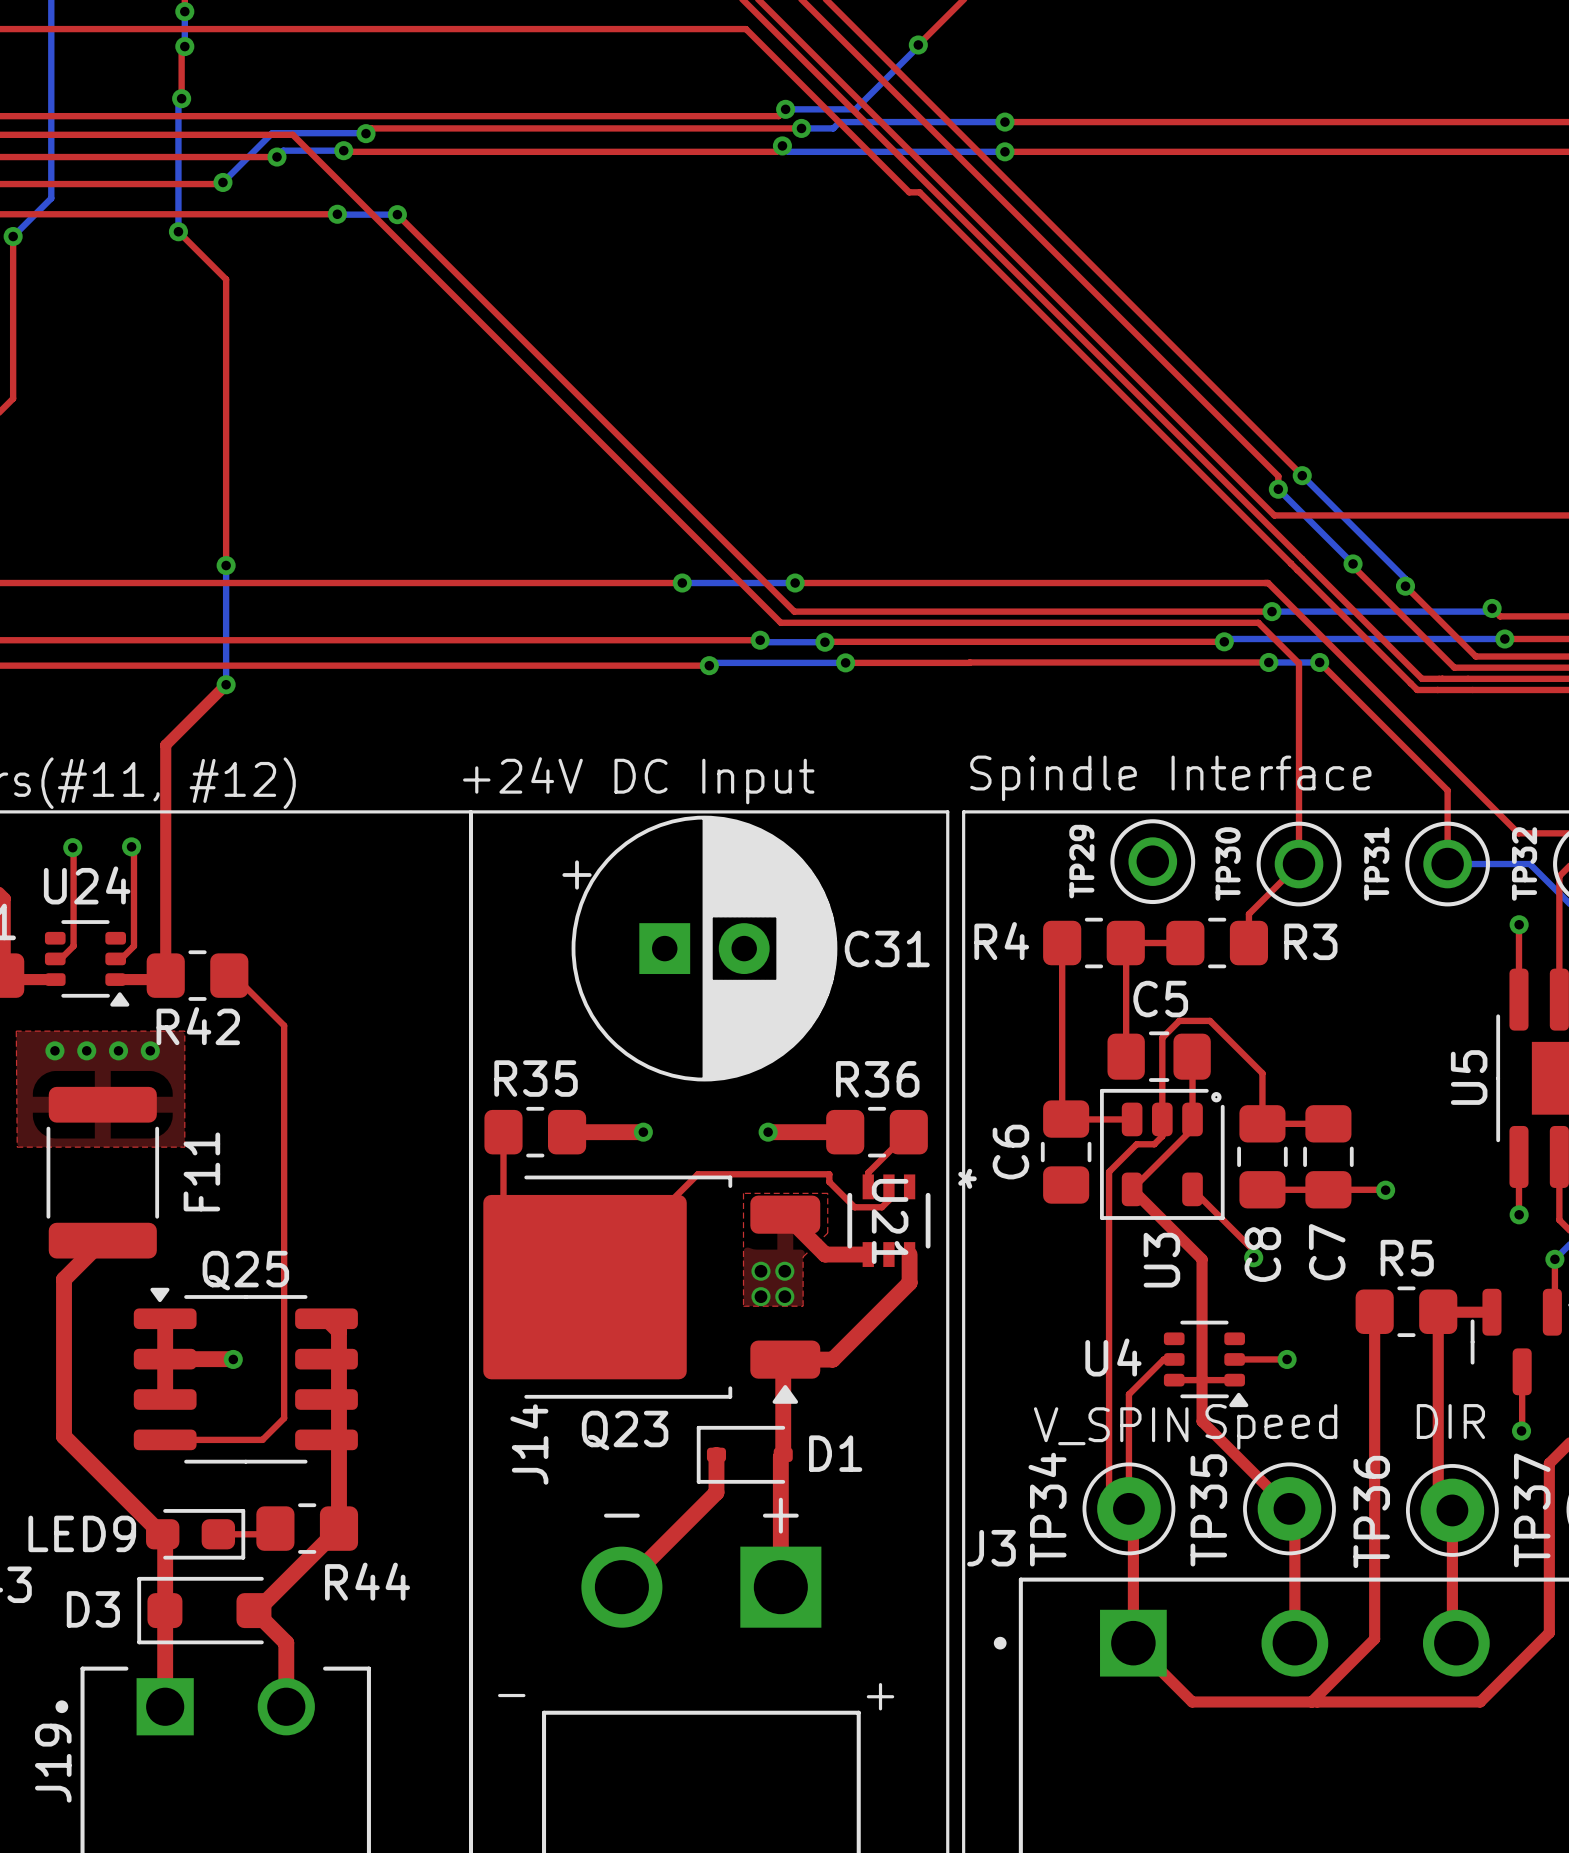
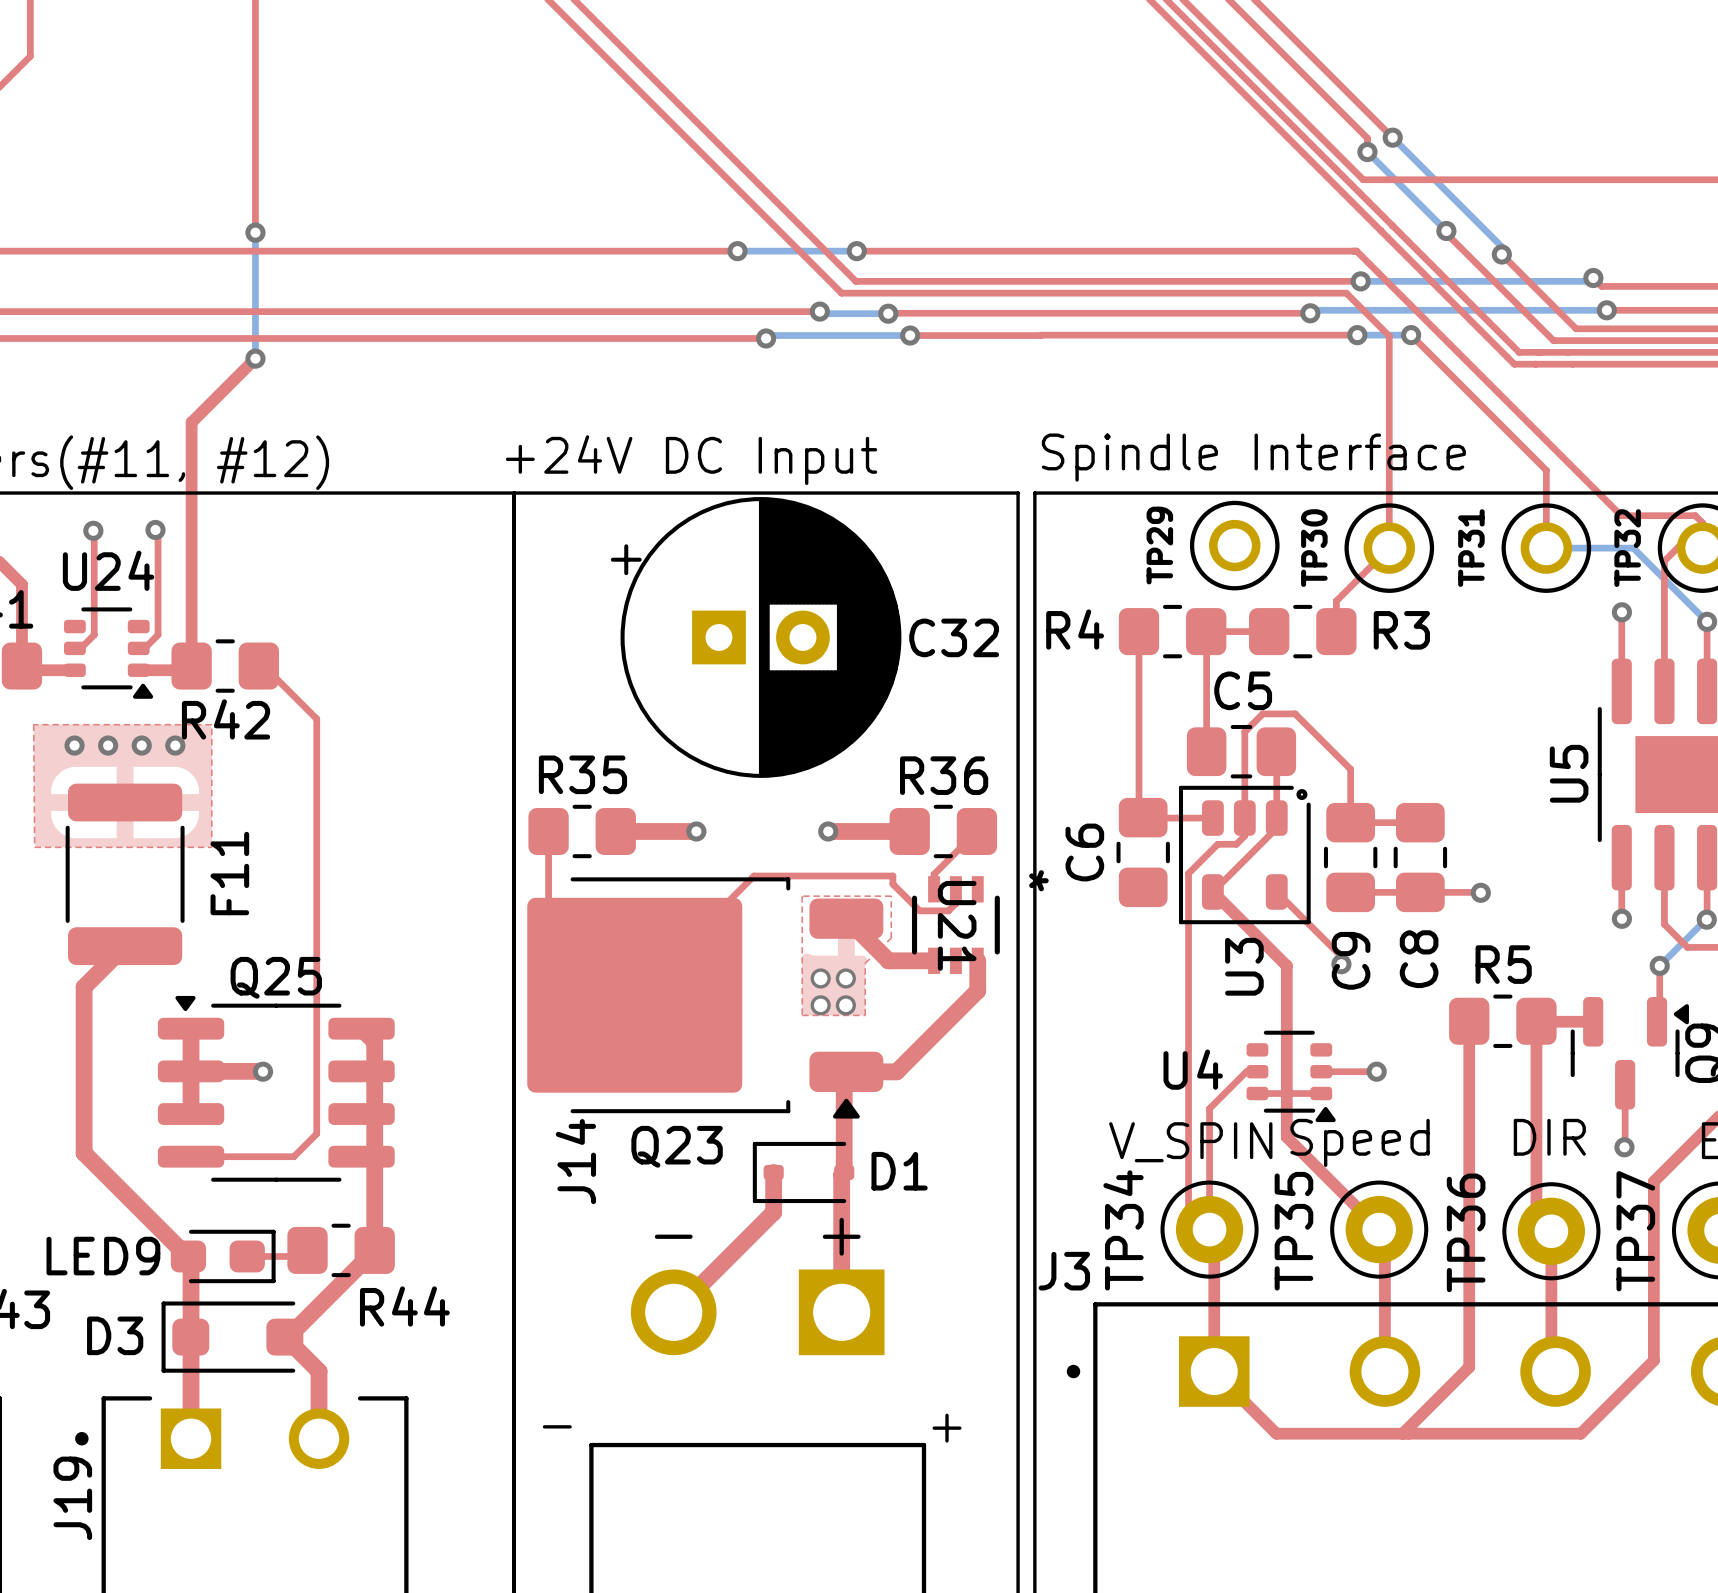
C31 name: C31 (887, 948) -> C32 (954, 637)
C7 name: C7 (1327, 1252) -> C8 (1419, 959)
C8 name: C8 (1262, 1254) -> C9 (1351, 960)

